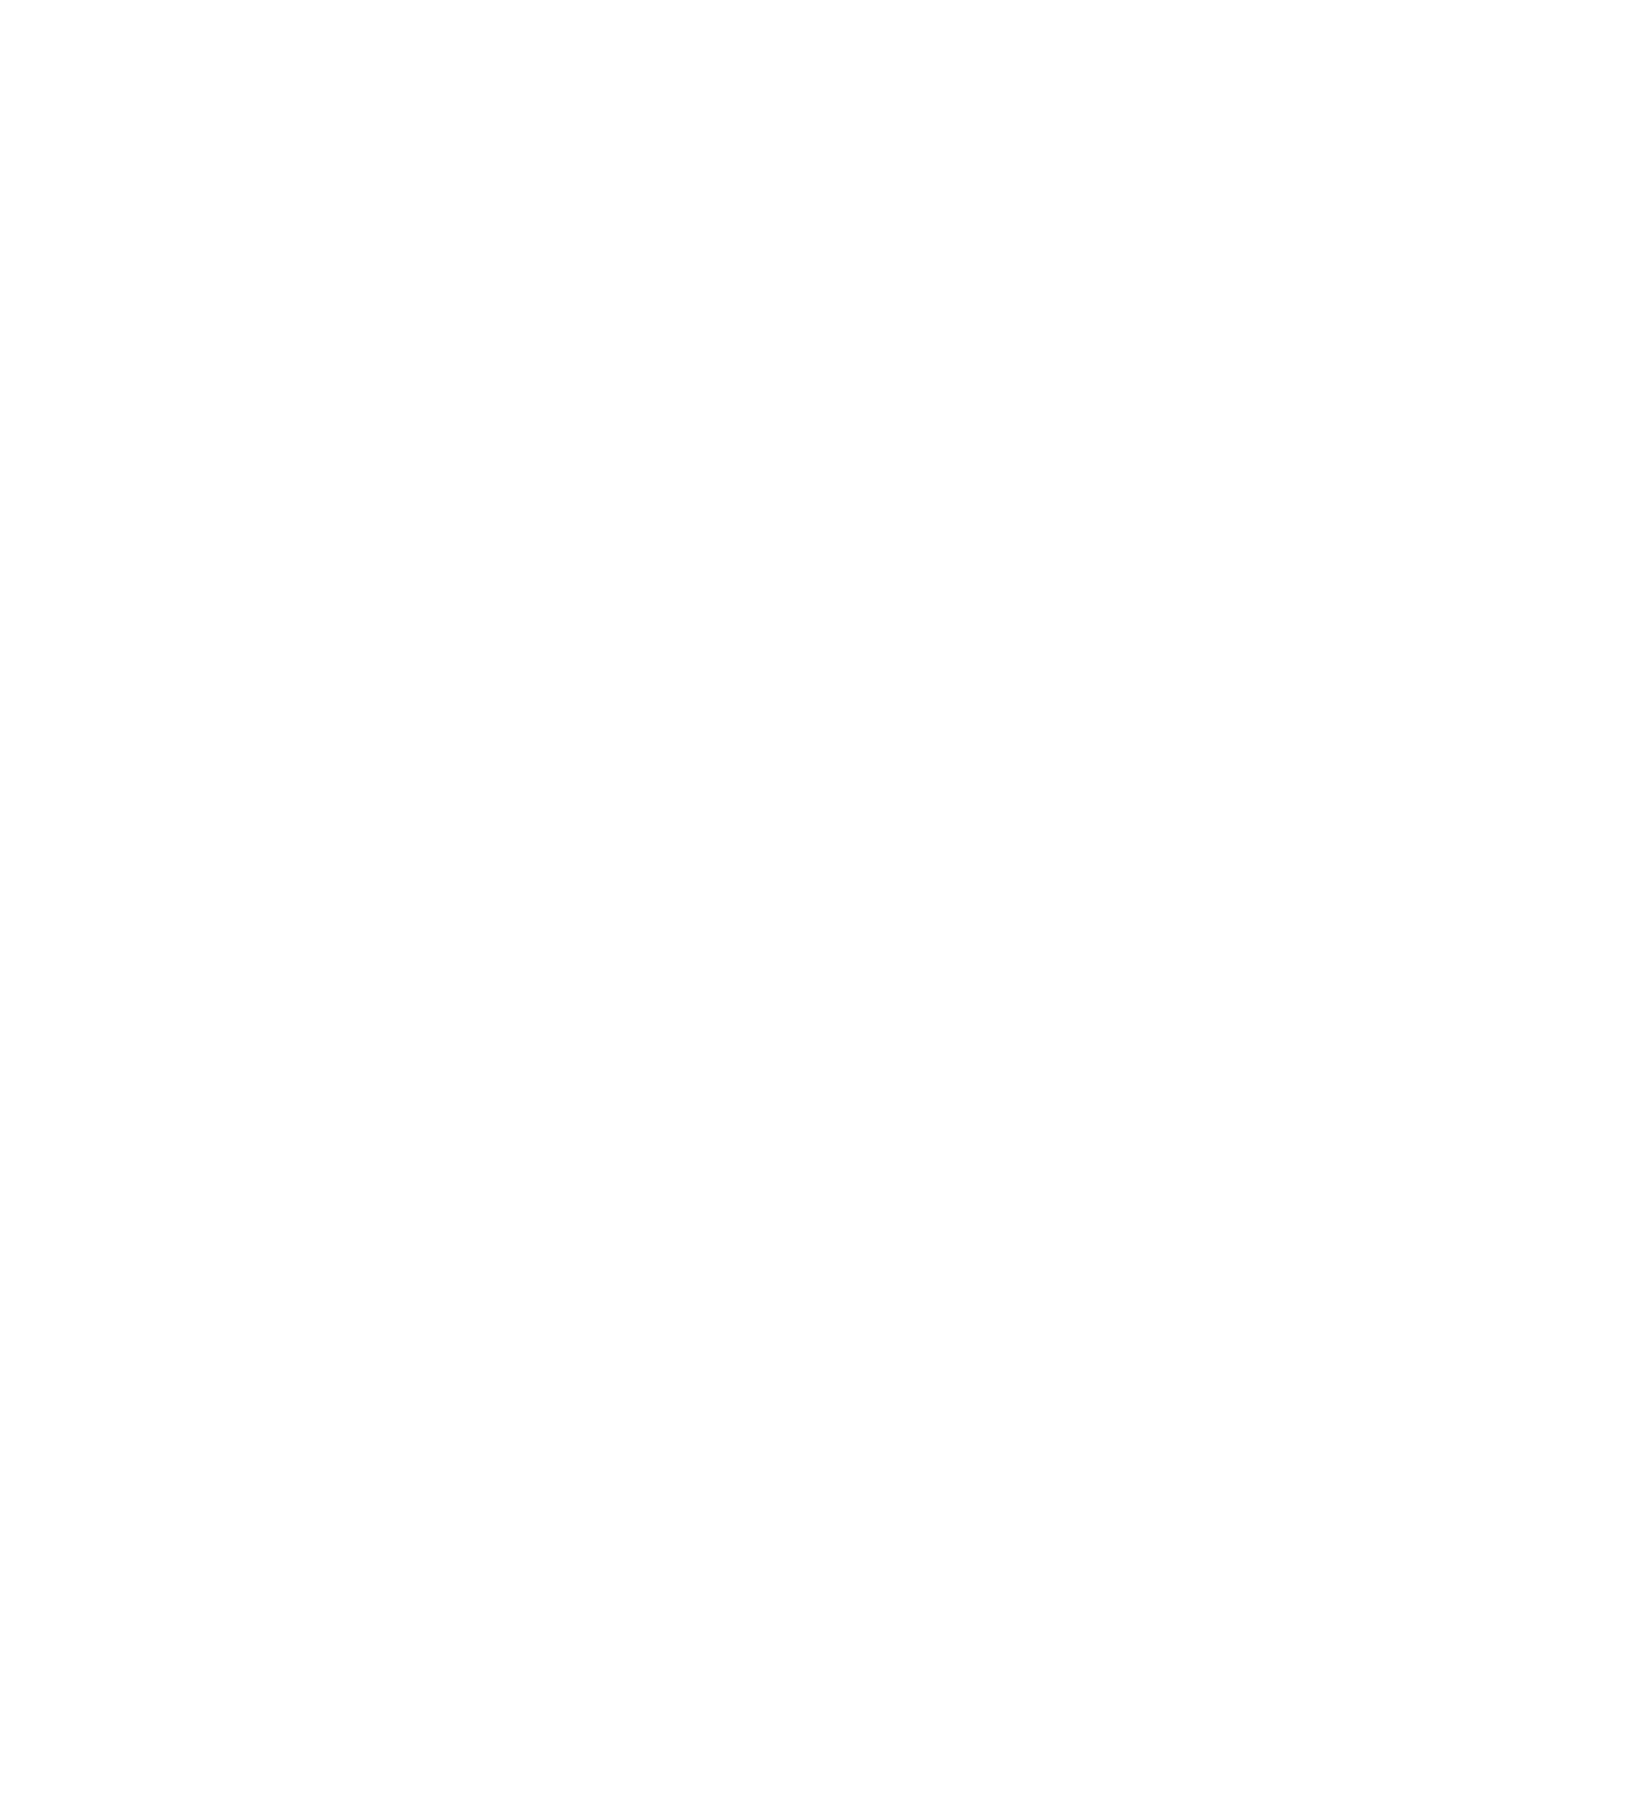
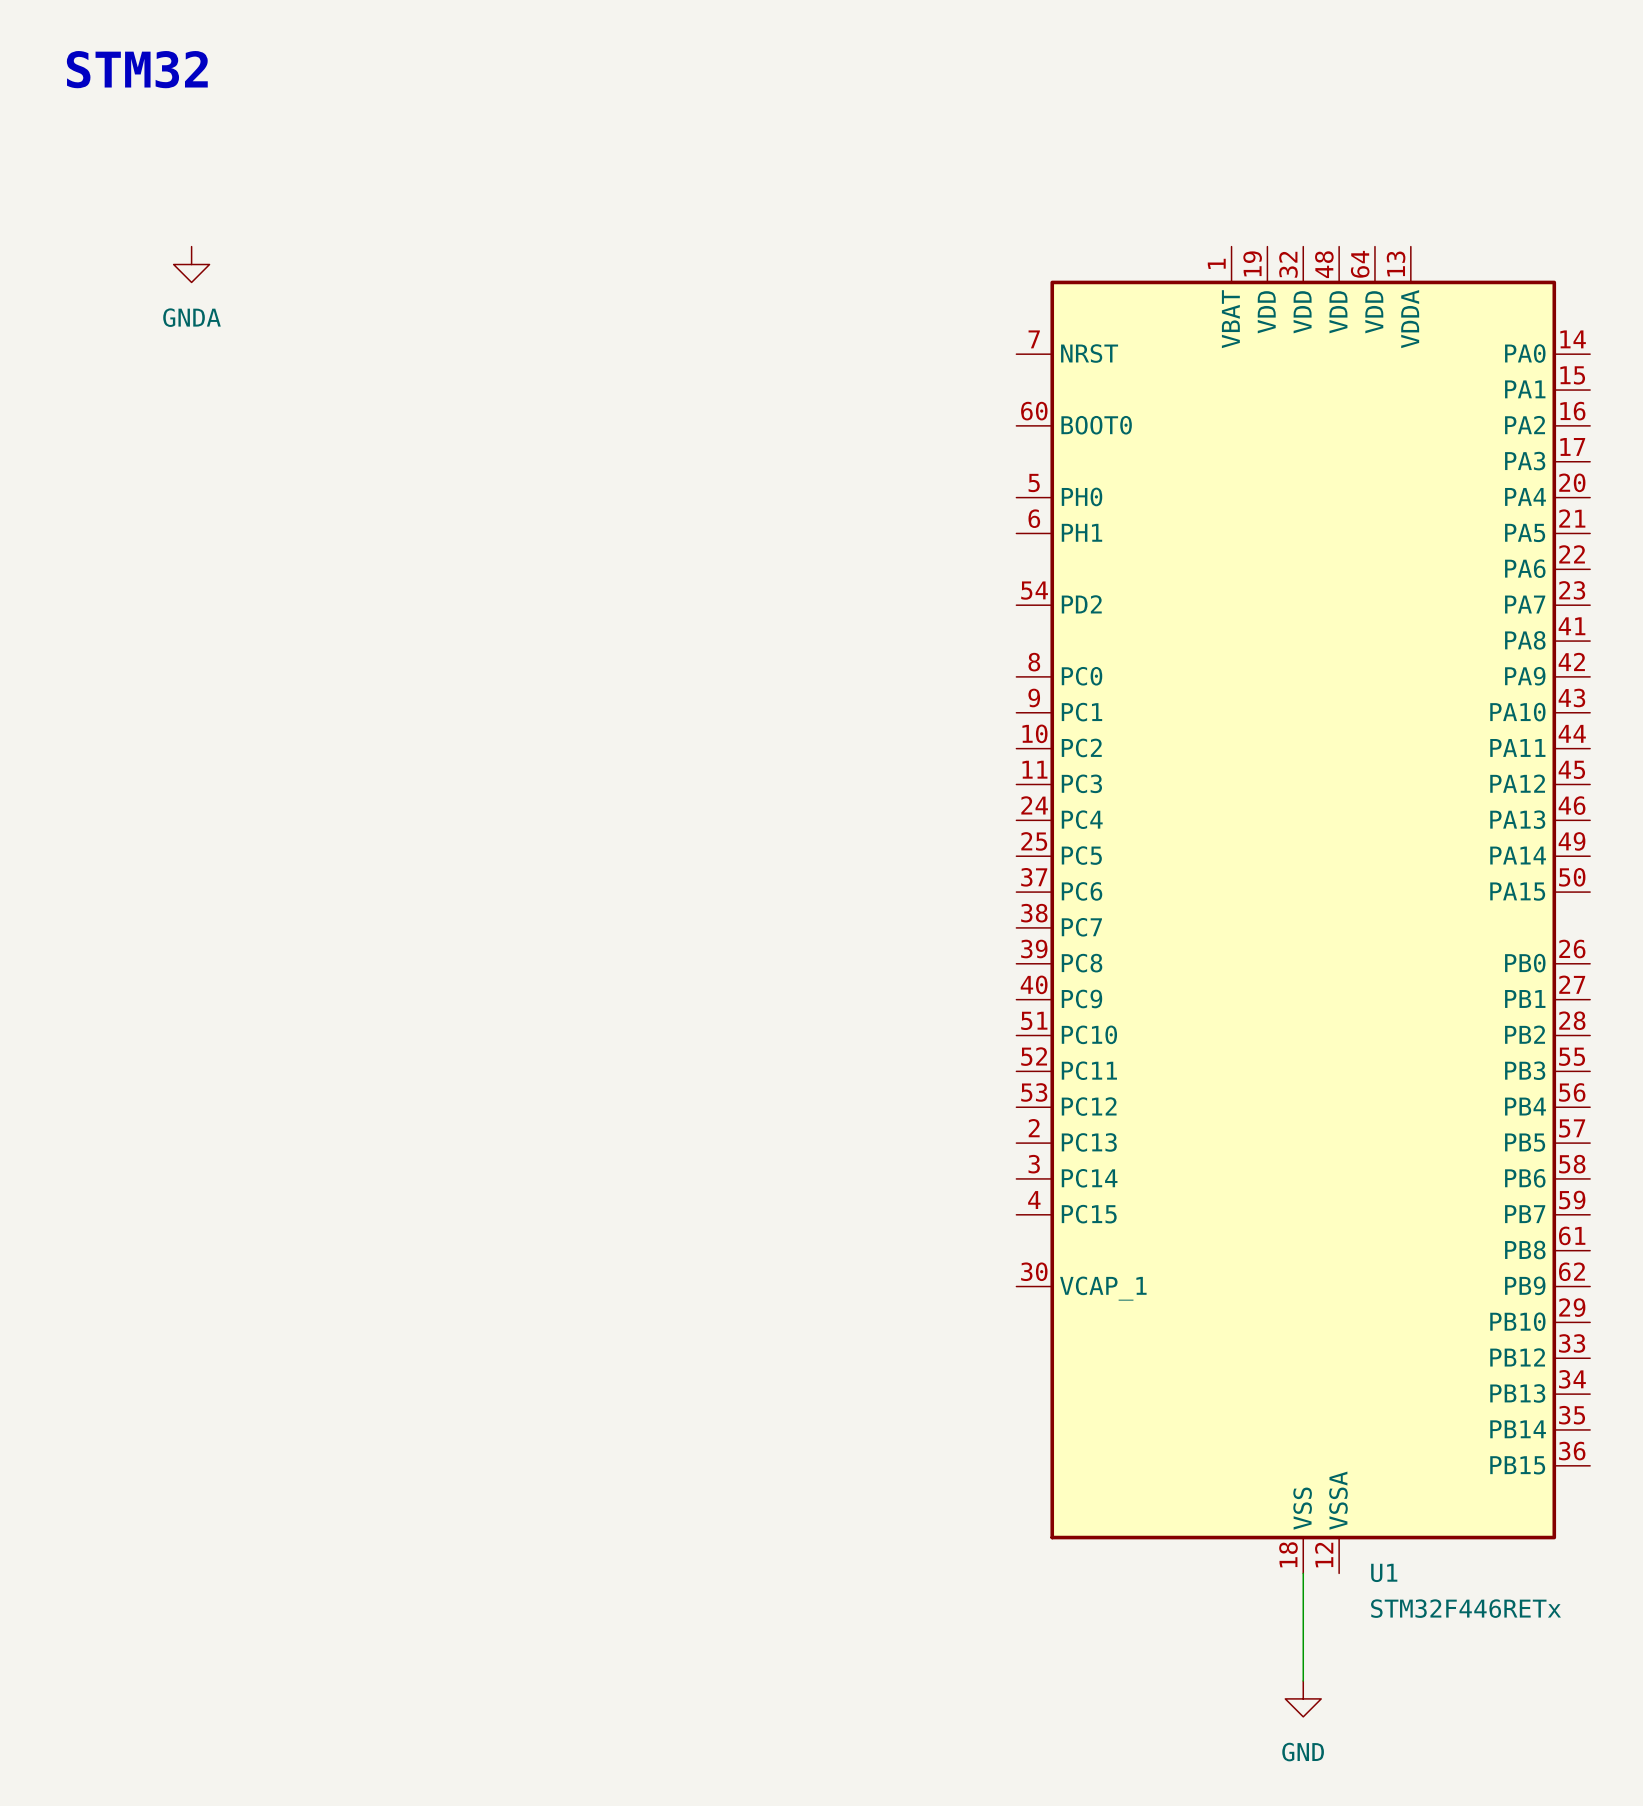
text: none -> STM32 (137, 69)
power symbol: none -> GNDA (191, 264)
U1: none -> STM32F446RETx (1303, 910)
wire: none -> (1303, 1573) (1303, 1680)
power symbol: none -> GND (1303, 1698)

